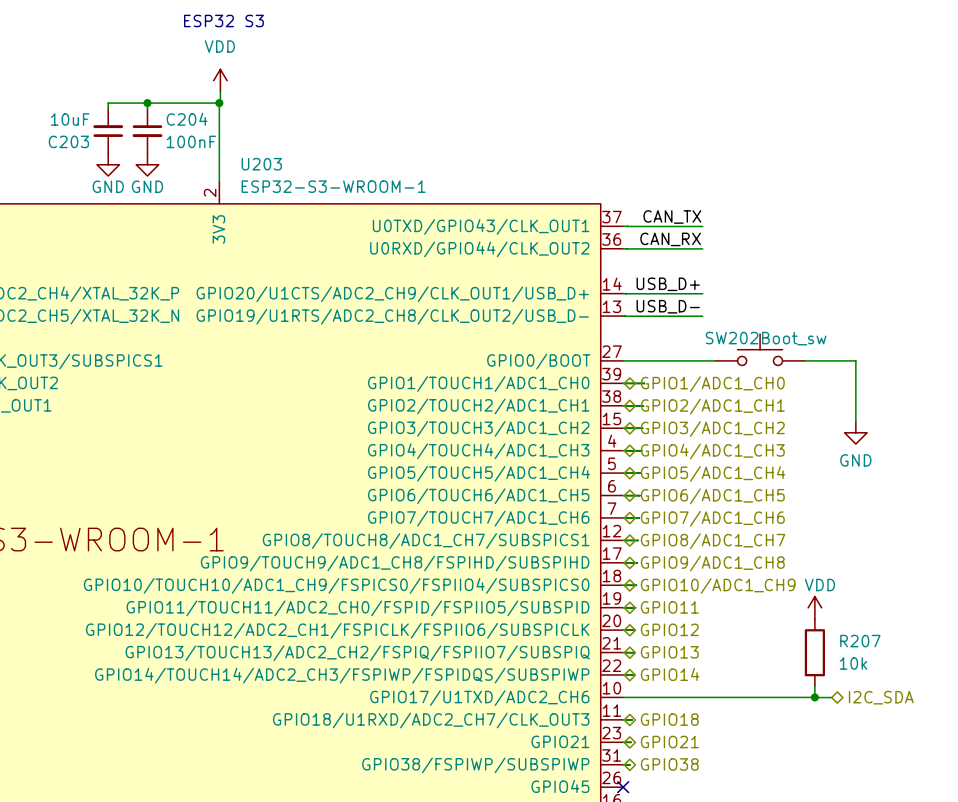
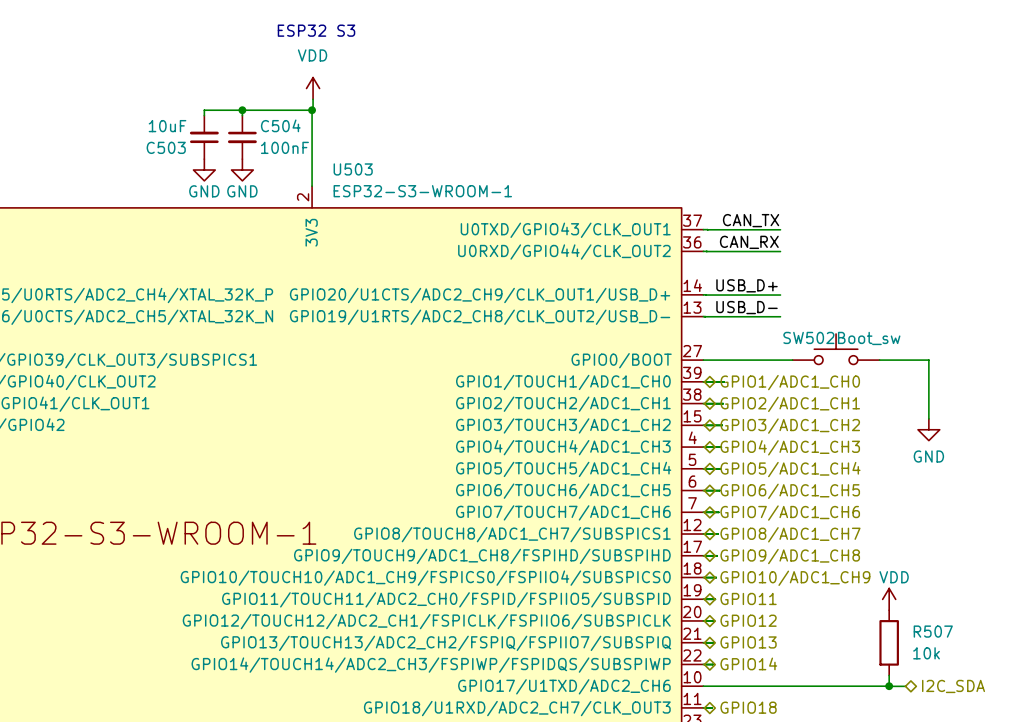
C204 name: C204 (187, 119) -> C504 (280, 125)
C203 name: C203 (68, 141) -> C503 (166, 147)
U203 name: U203 (261, 164) -> U503 (353, 169)
SW202 name: SW202 (732, 338) -> SW502 (808, 337)
R207 name: R207 (860, 641) -> R507 (933, 631)

